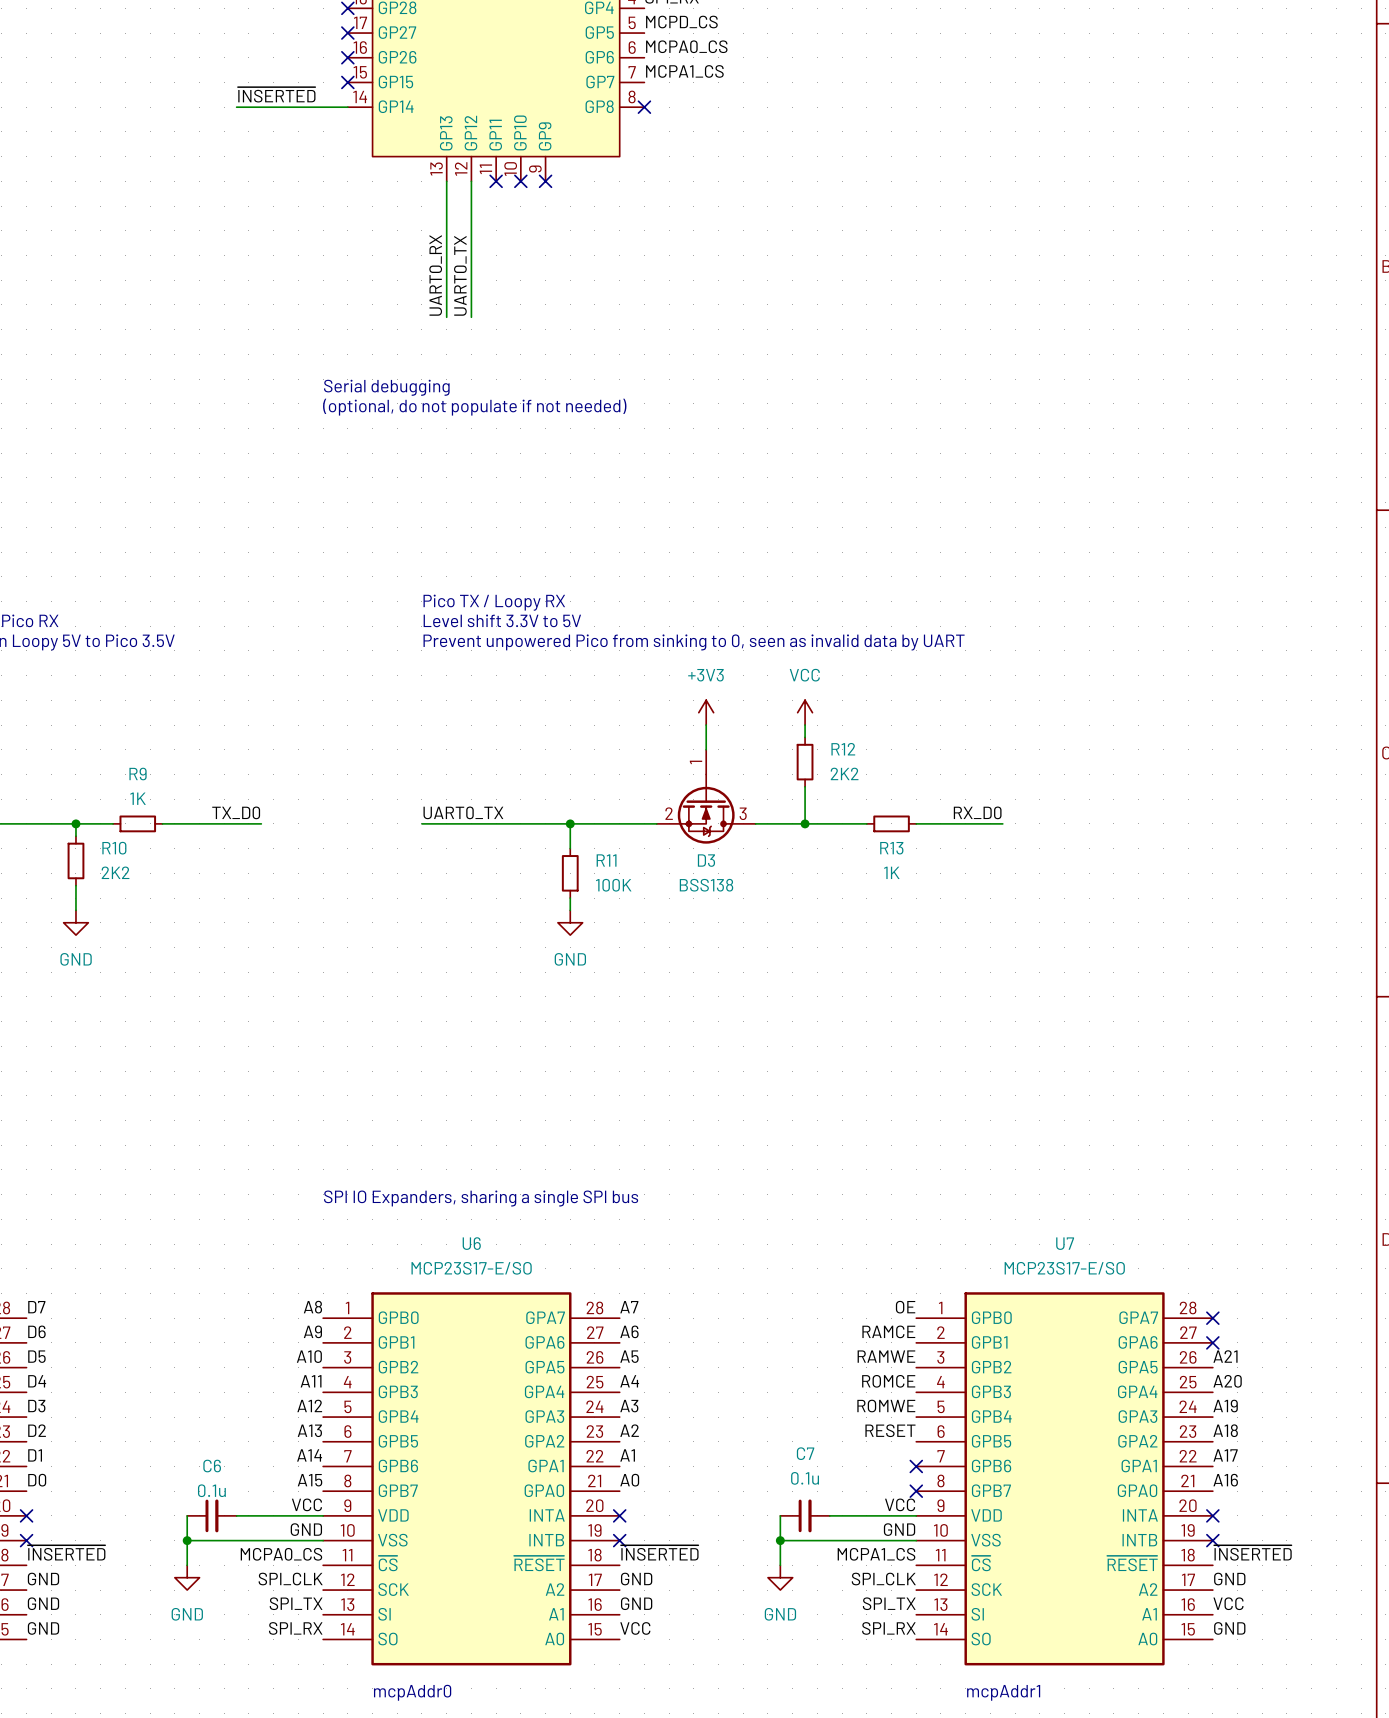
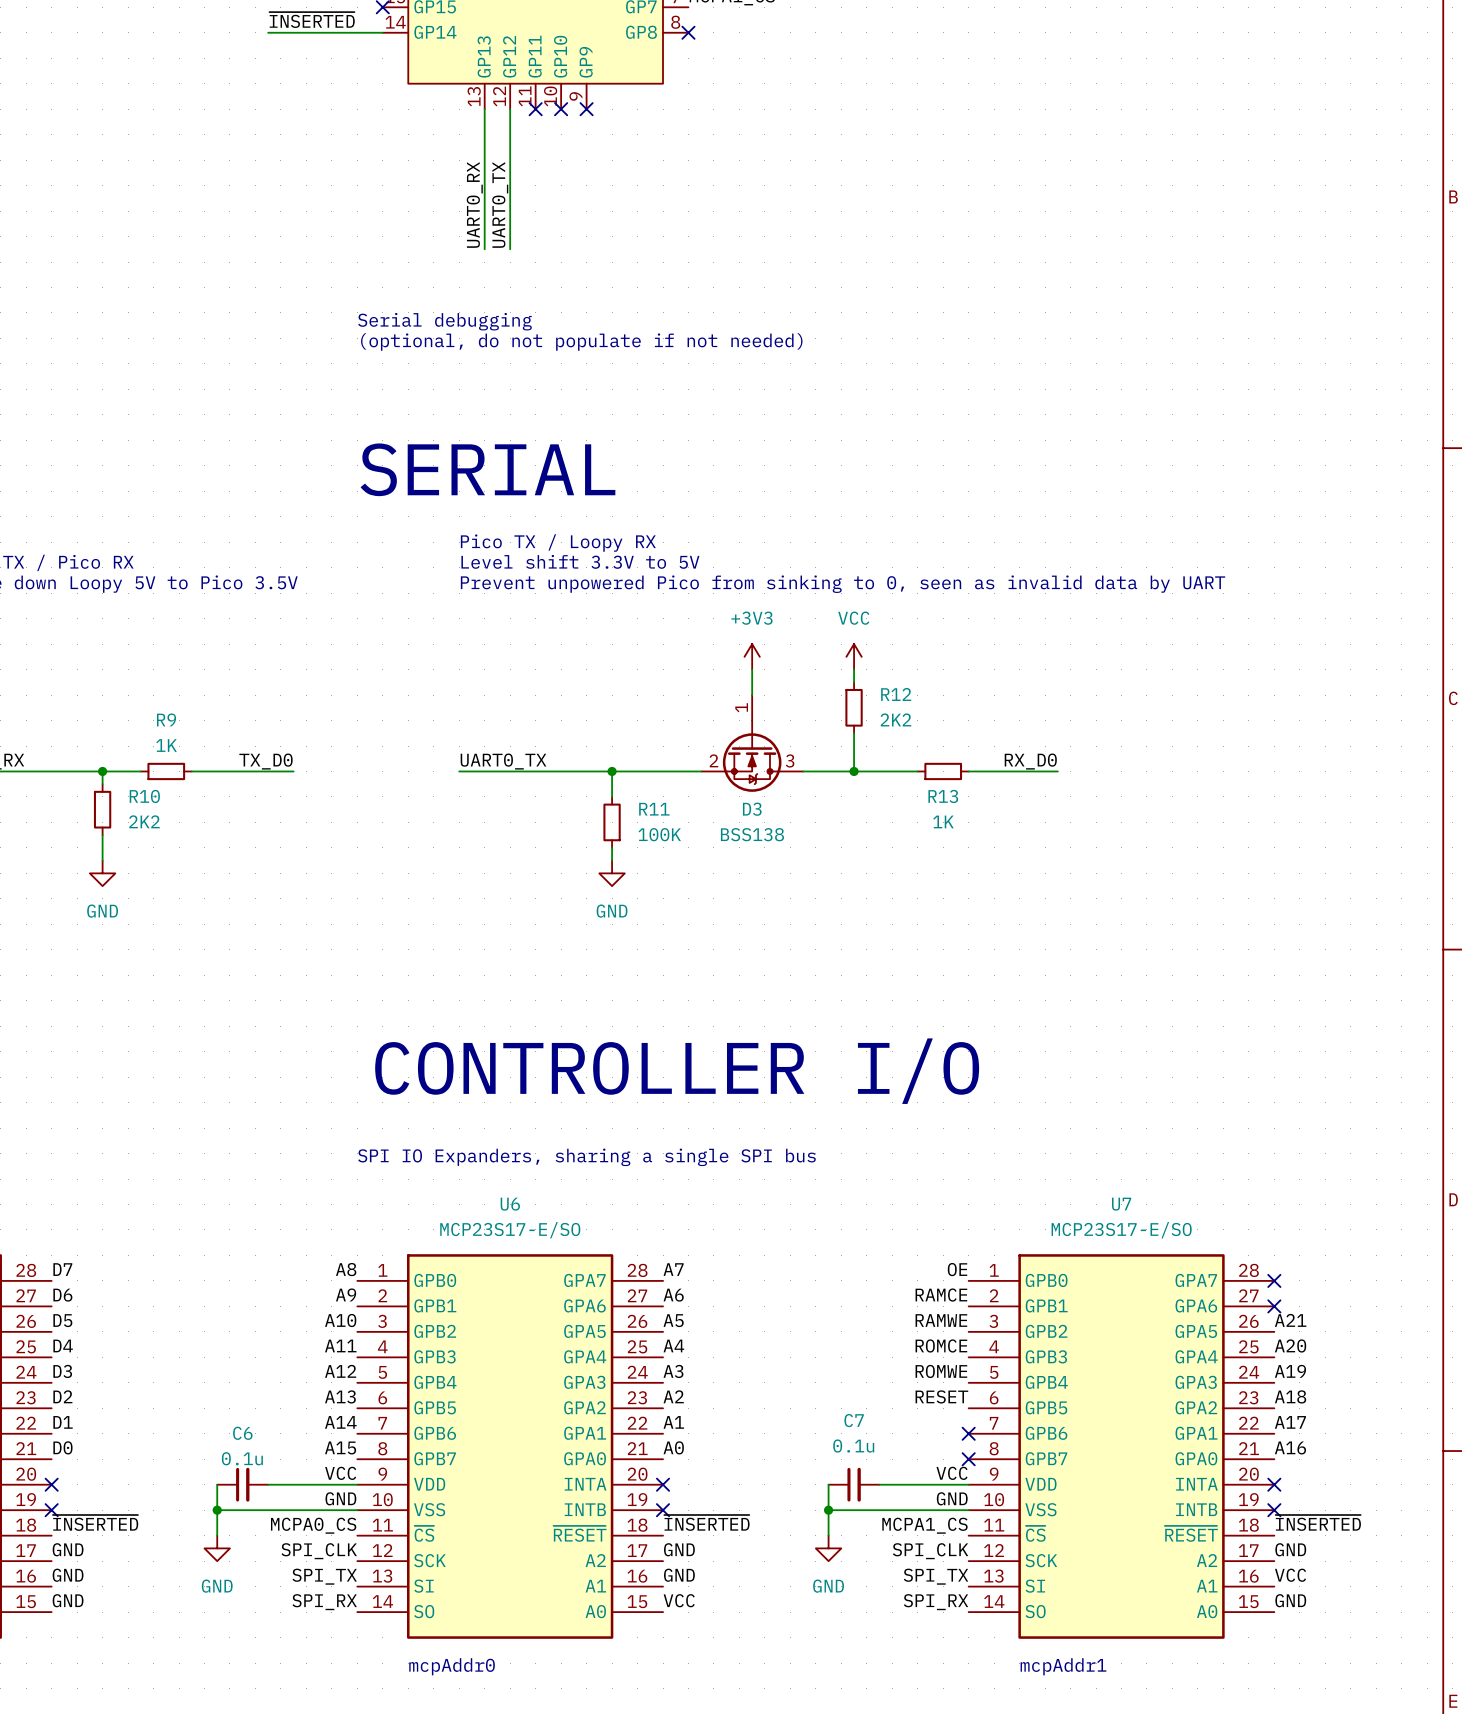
text: none -> SERIAL (487, 469)
text: none -> CONTROLLER I/O (677, 1071)

